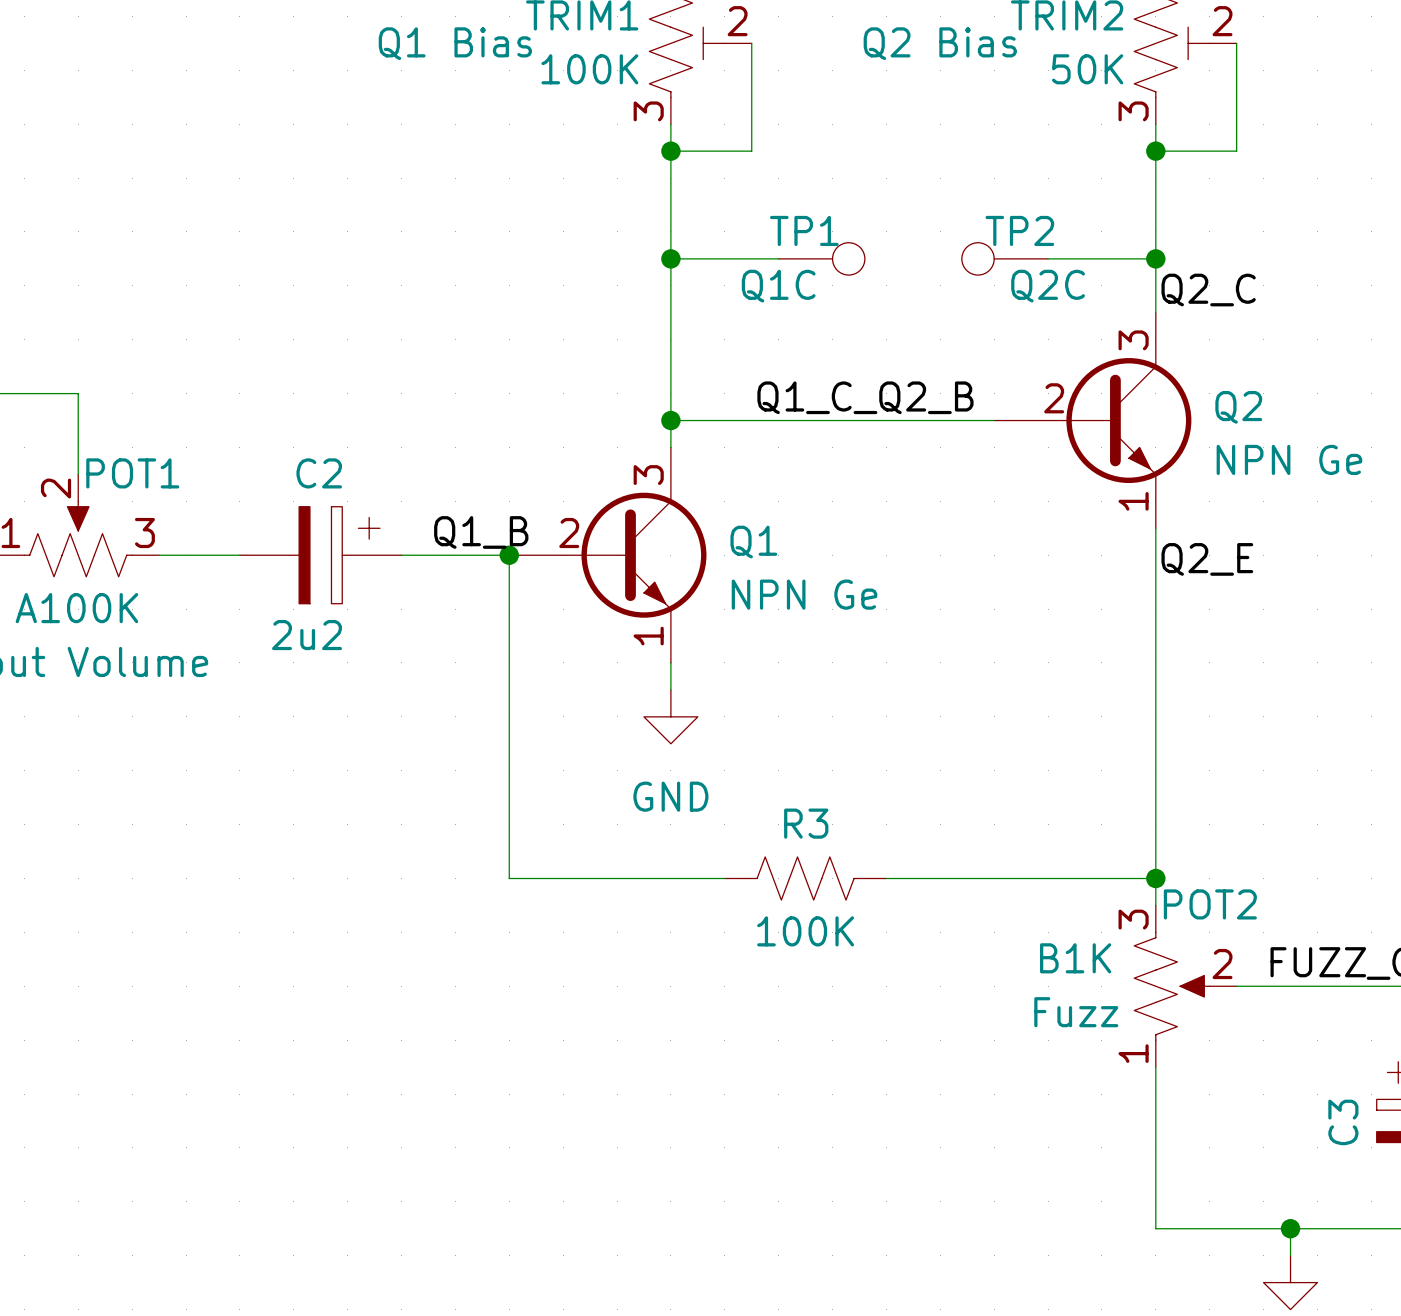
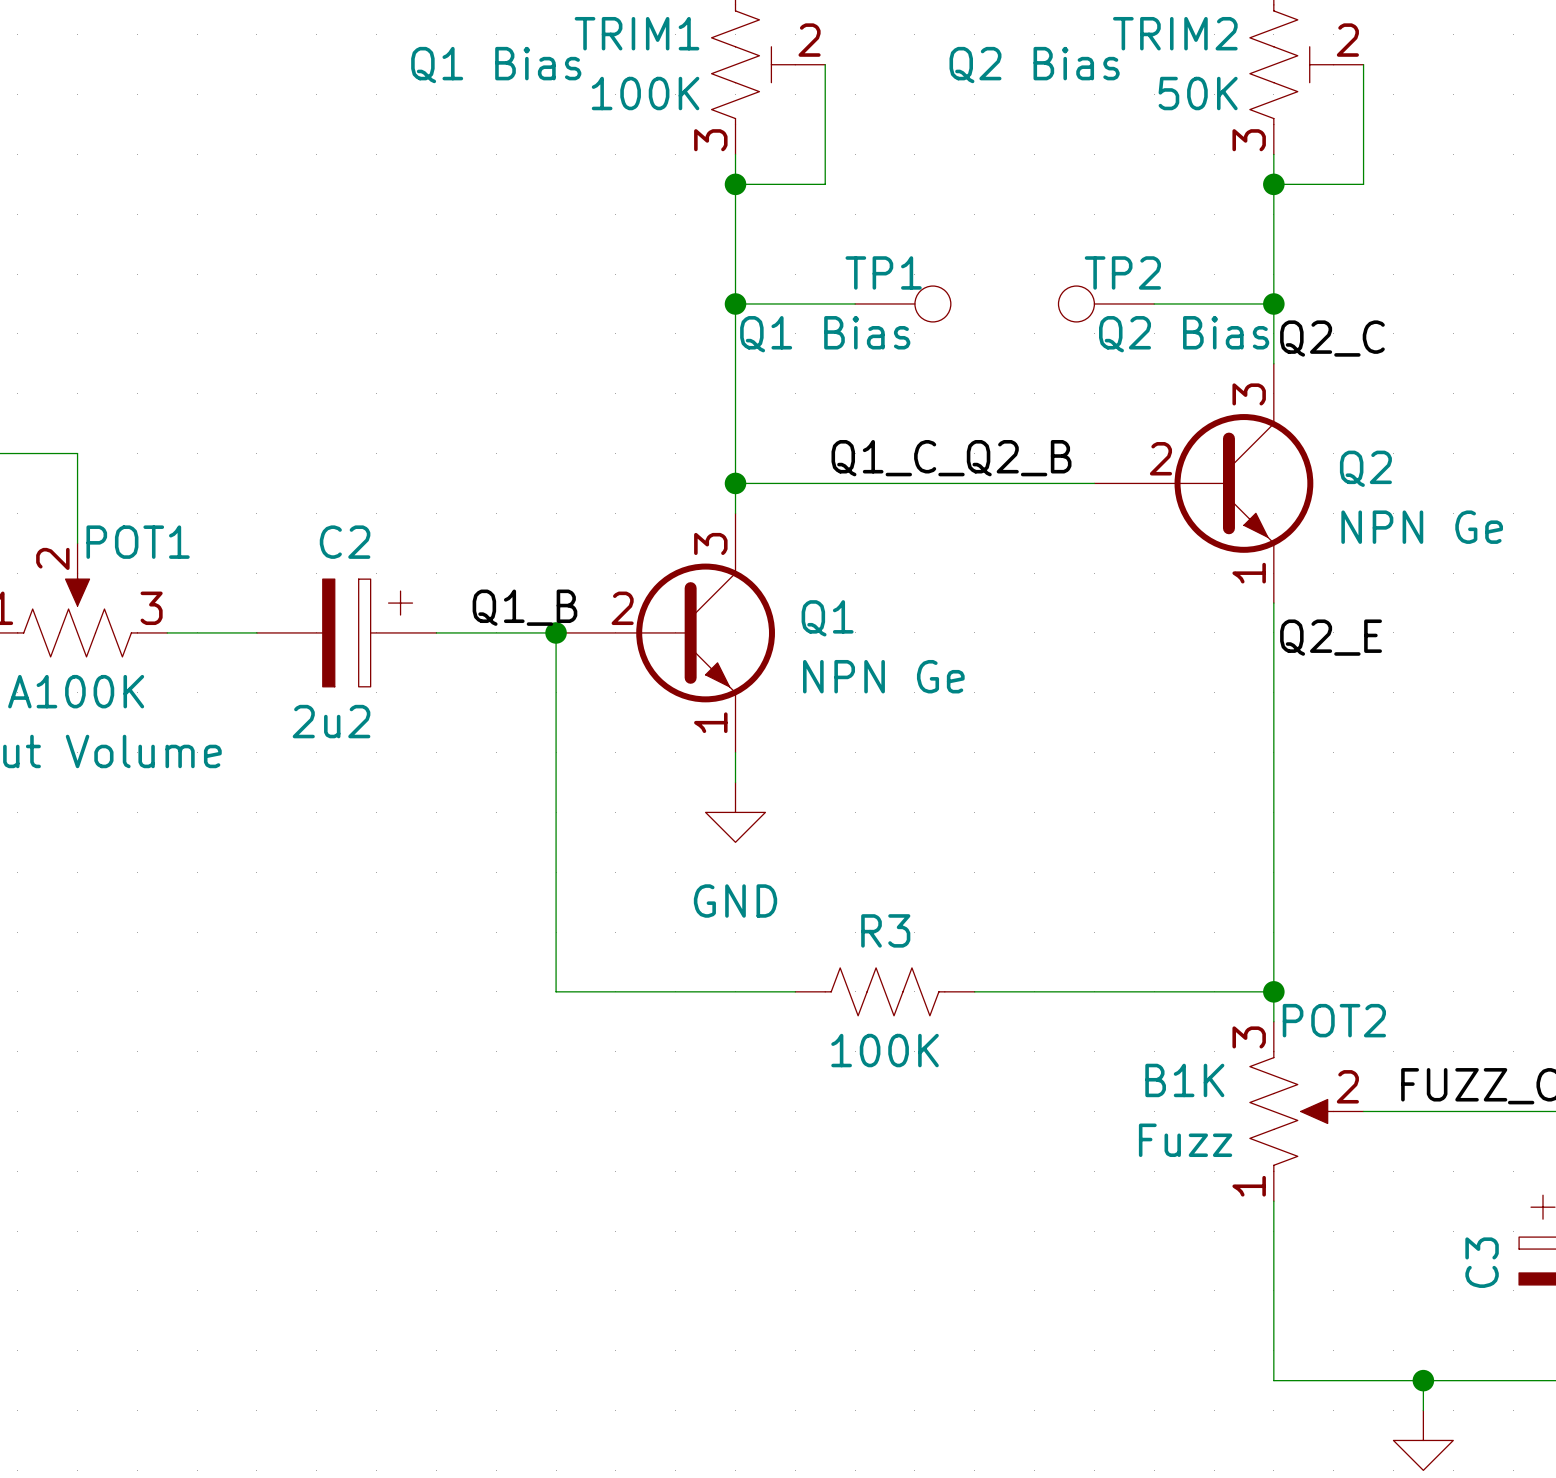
TP1 value: Q1C (778, 286) -> Q1 Bias (825, 334)
TP2 value: Q2C (1048, 286) -> Q2 Bias (1184, 334)

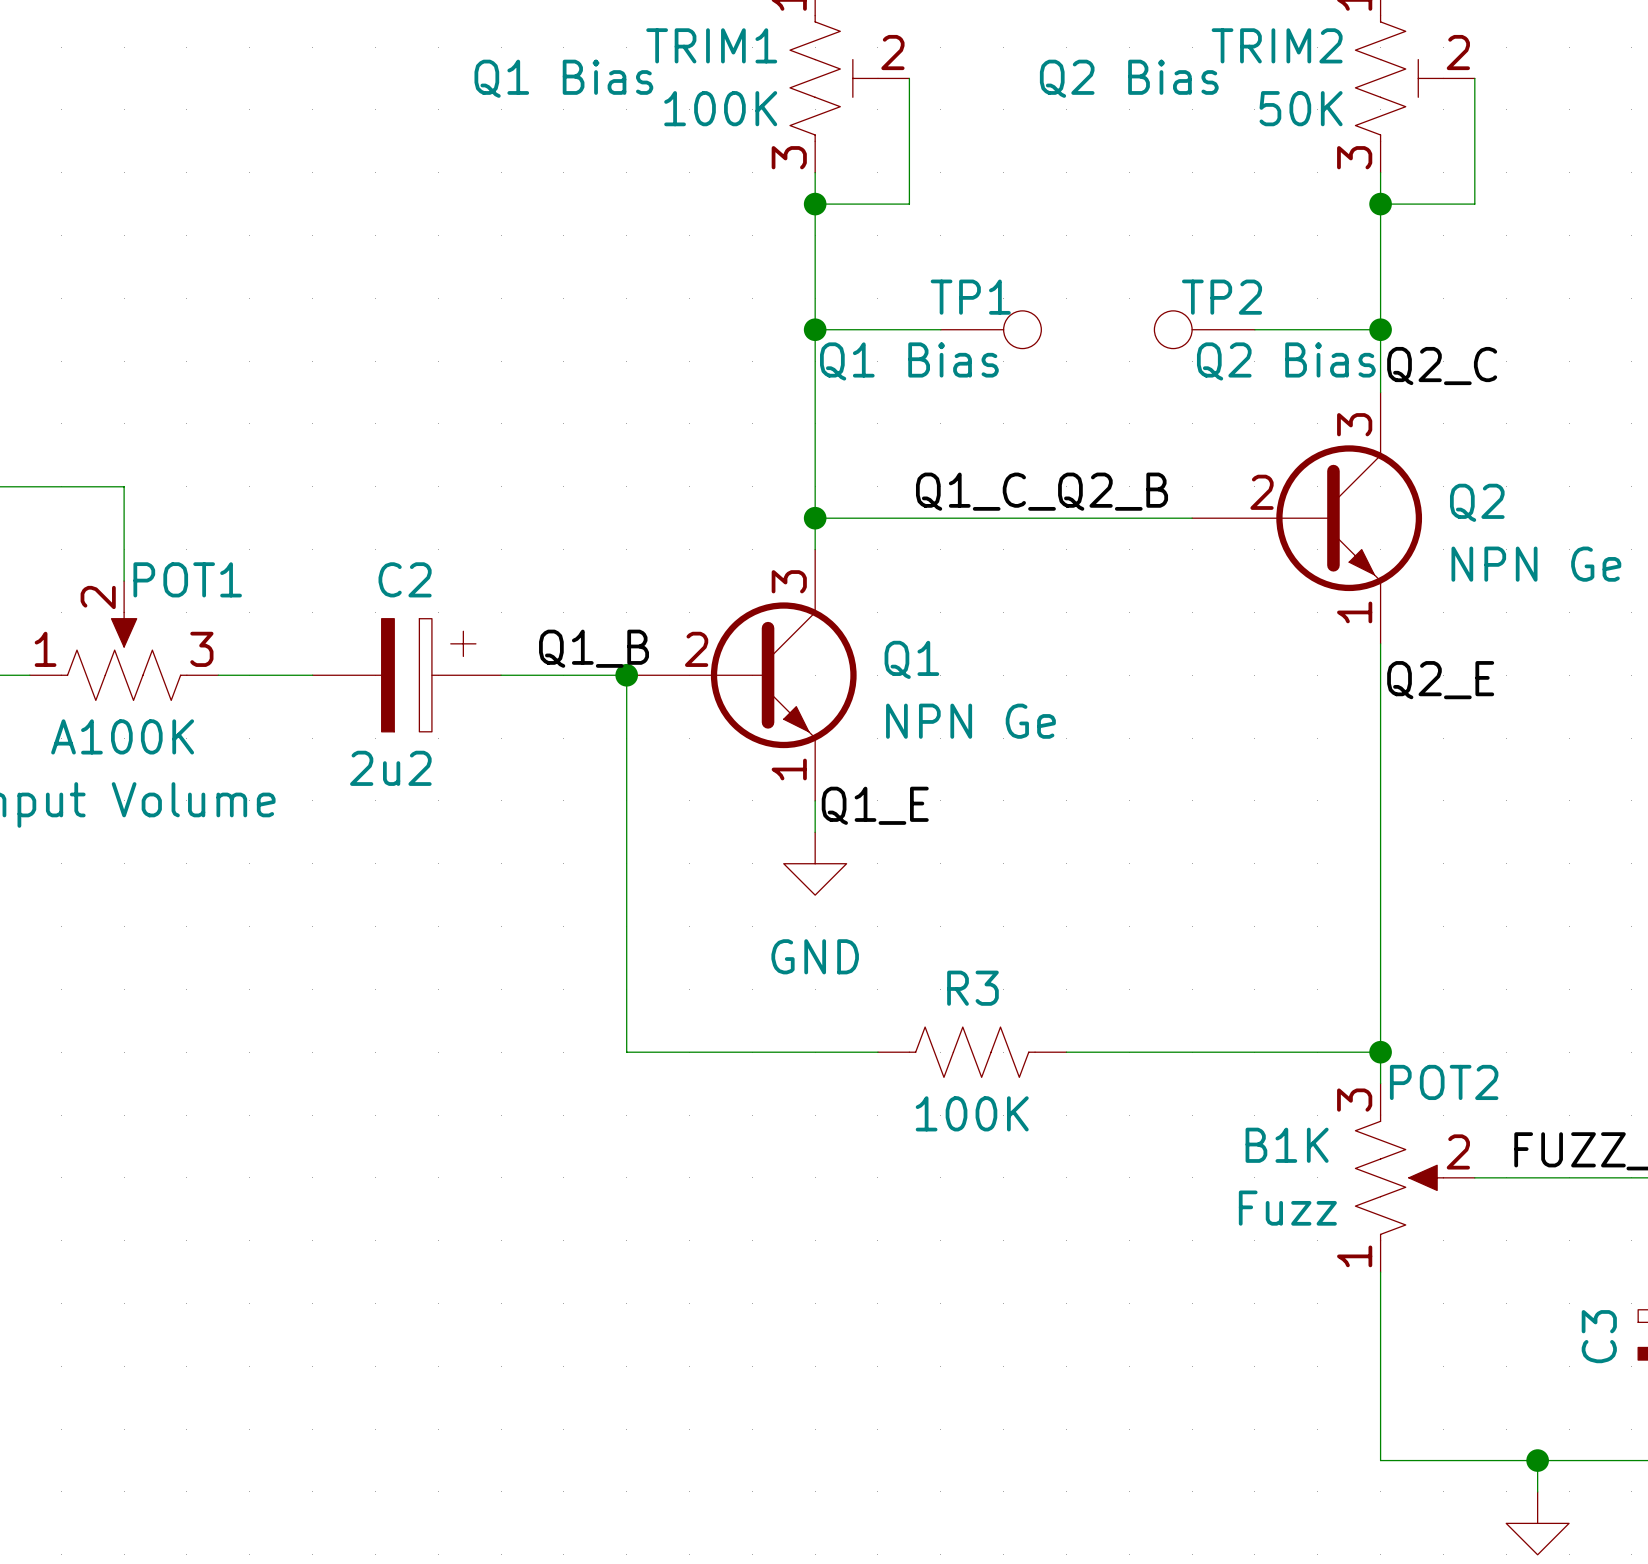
label: none -> Q1_E (875, 805)

